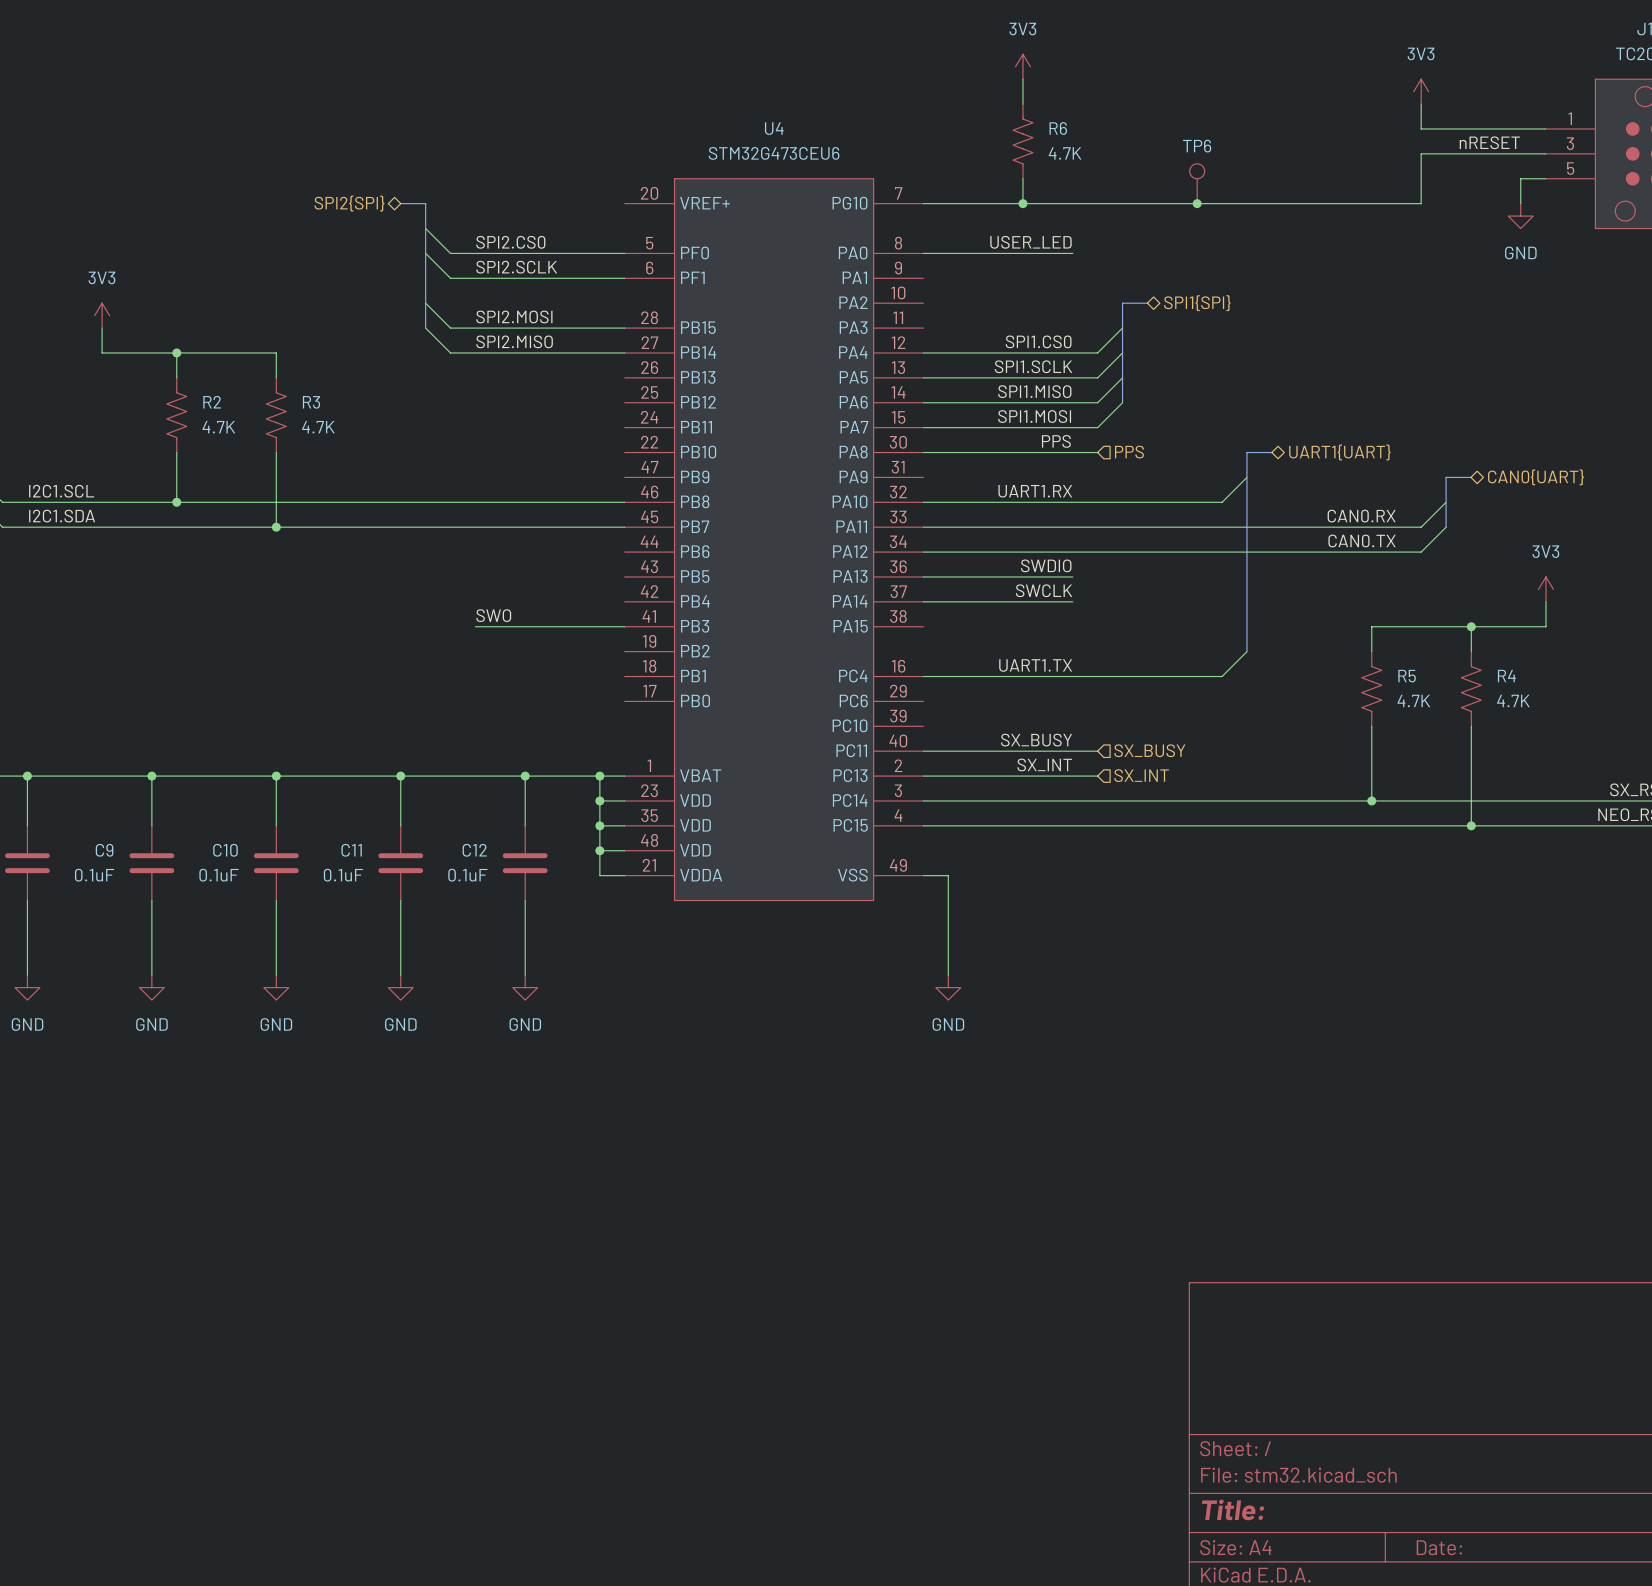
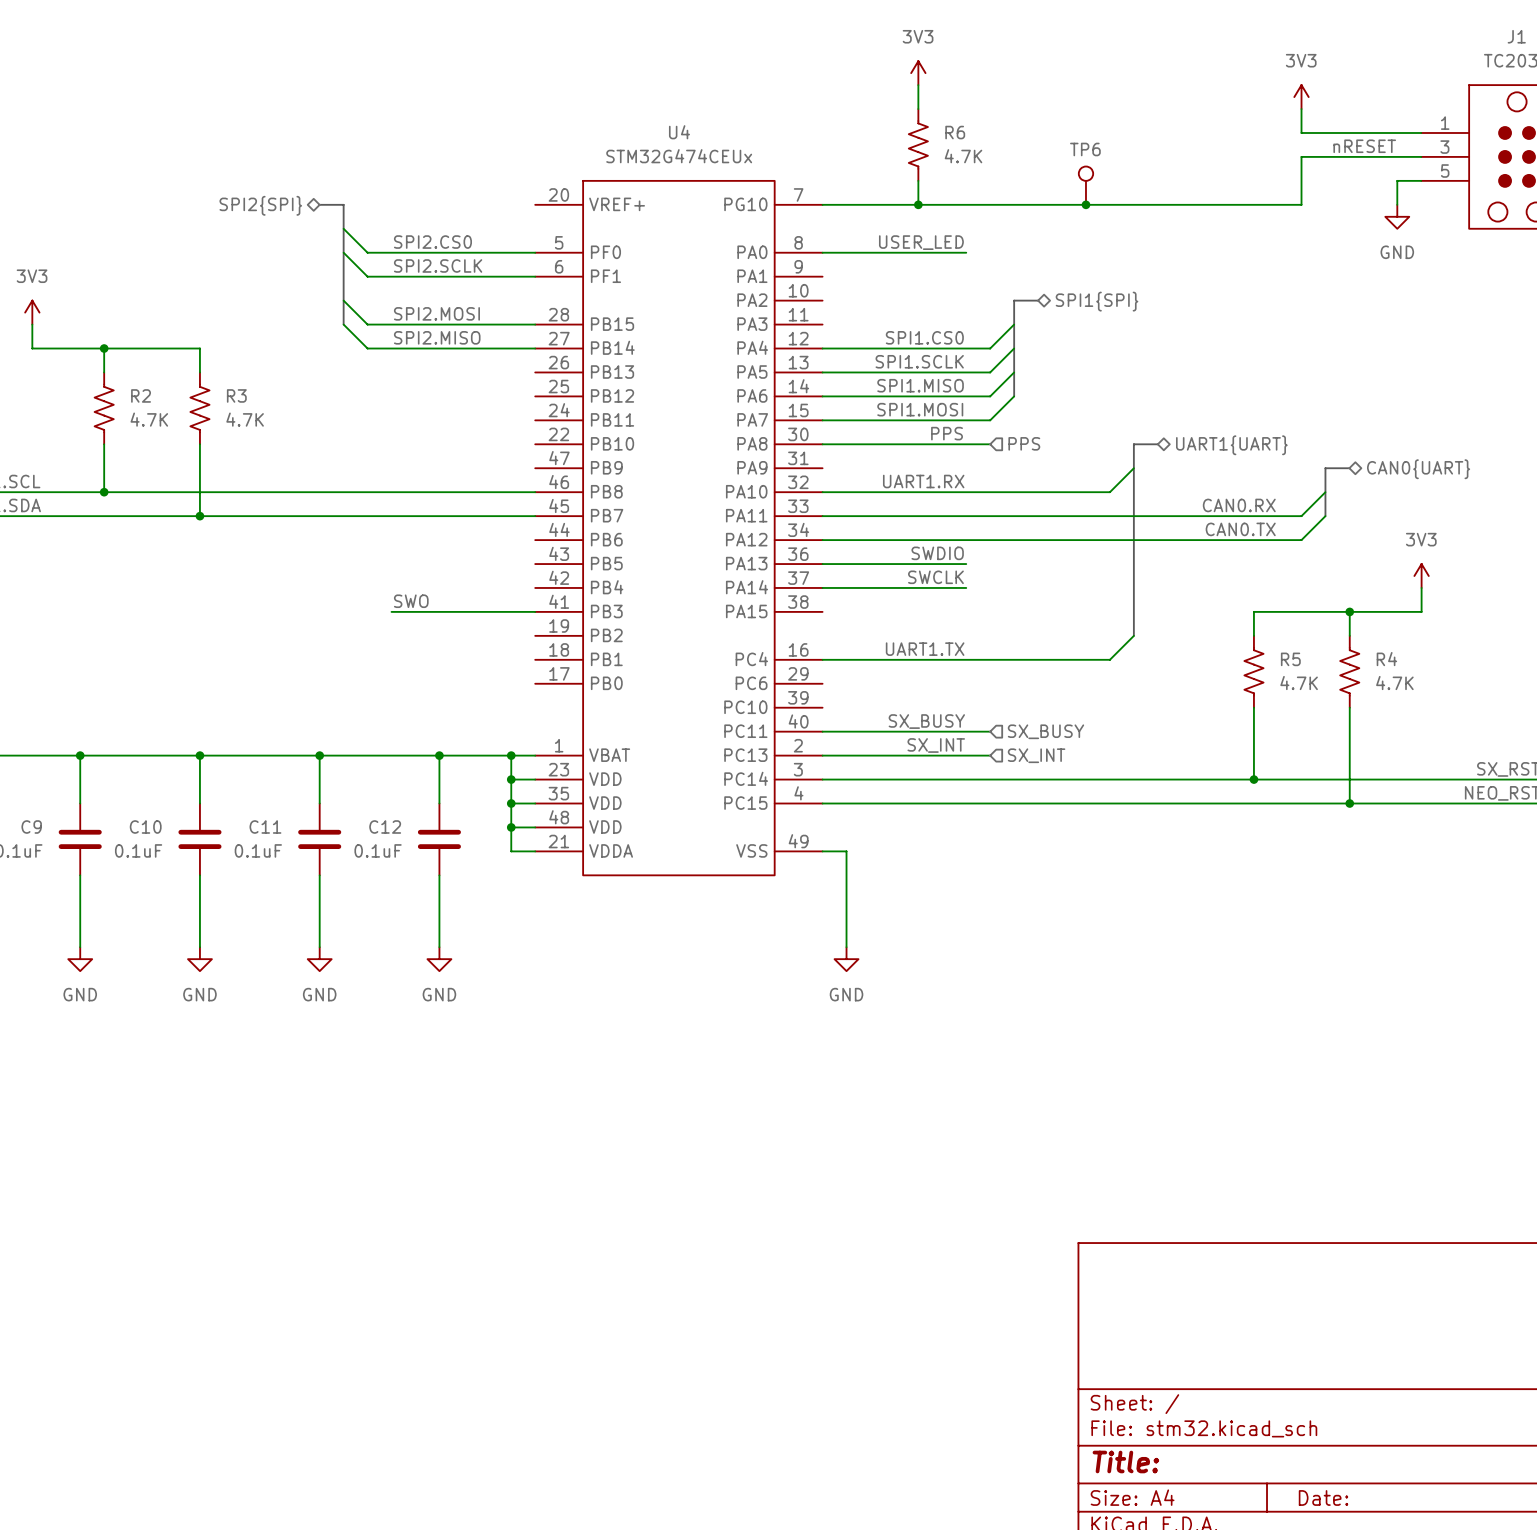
U4 value: STM32G473CEU6 (774, 153) -> STM32G474CEUx (679, 156)

